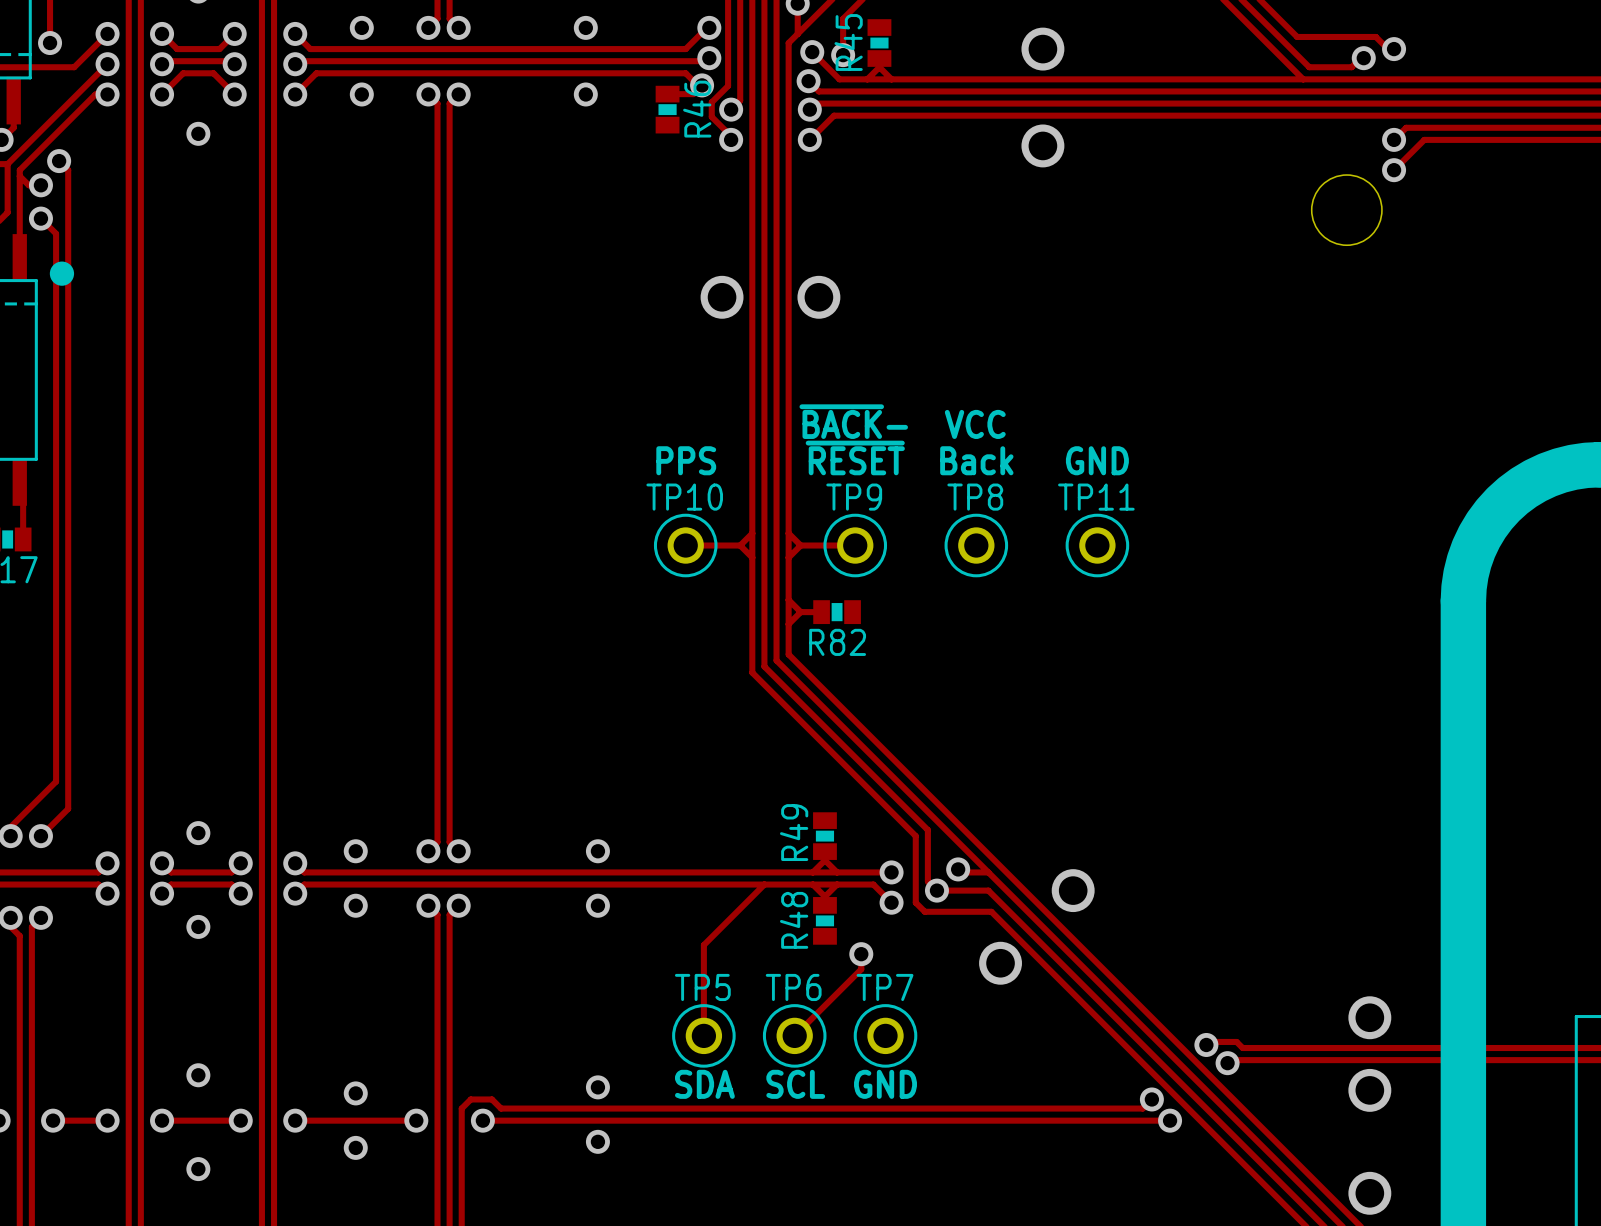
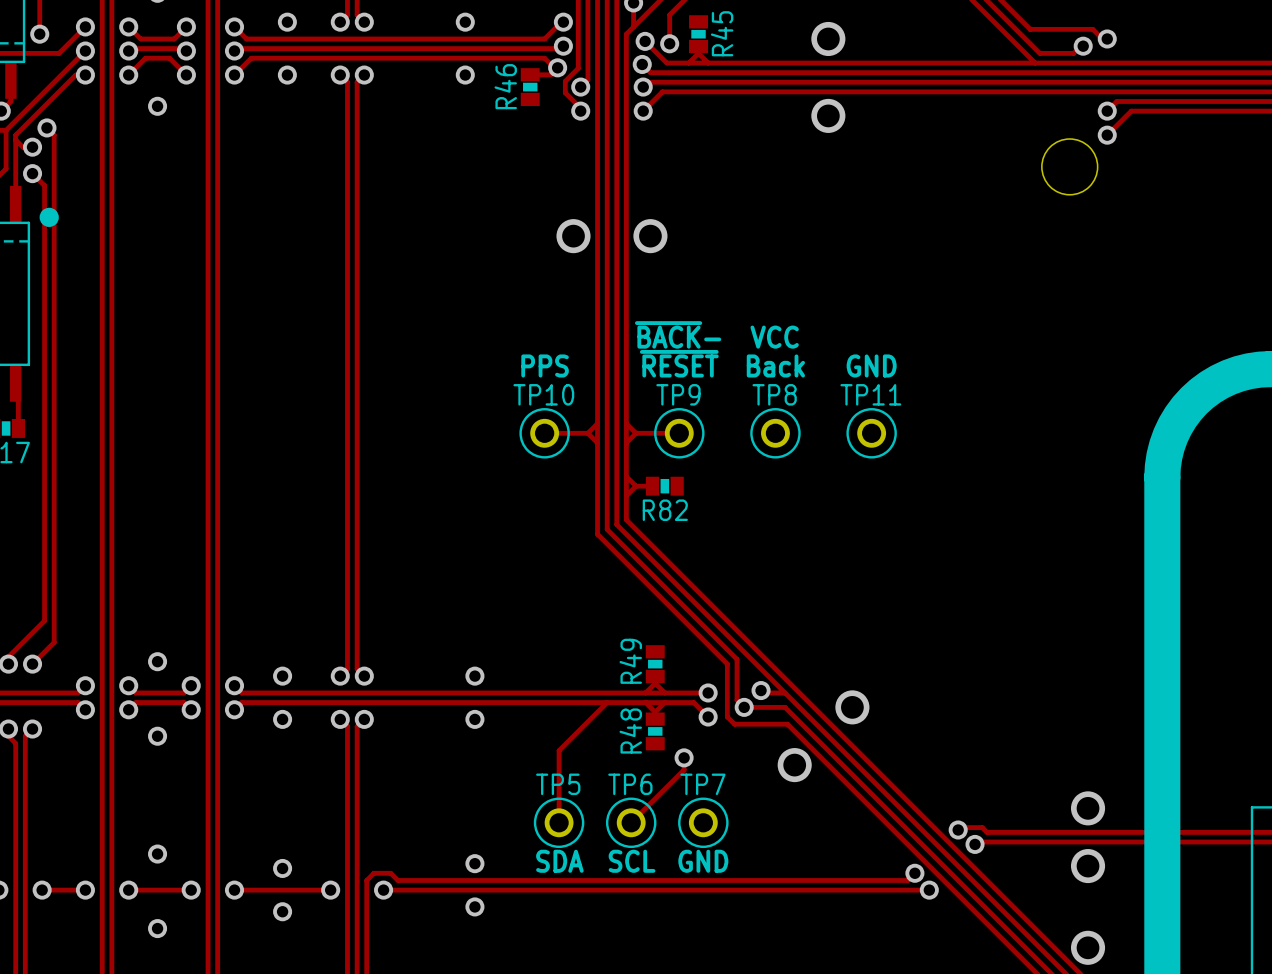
R45 name position: R45 (848, 42) -> R45 (722, 33)
R46 name position: R46 (697, 109) -> R46 (505, 86)

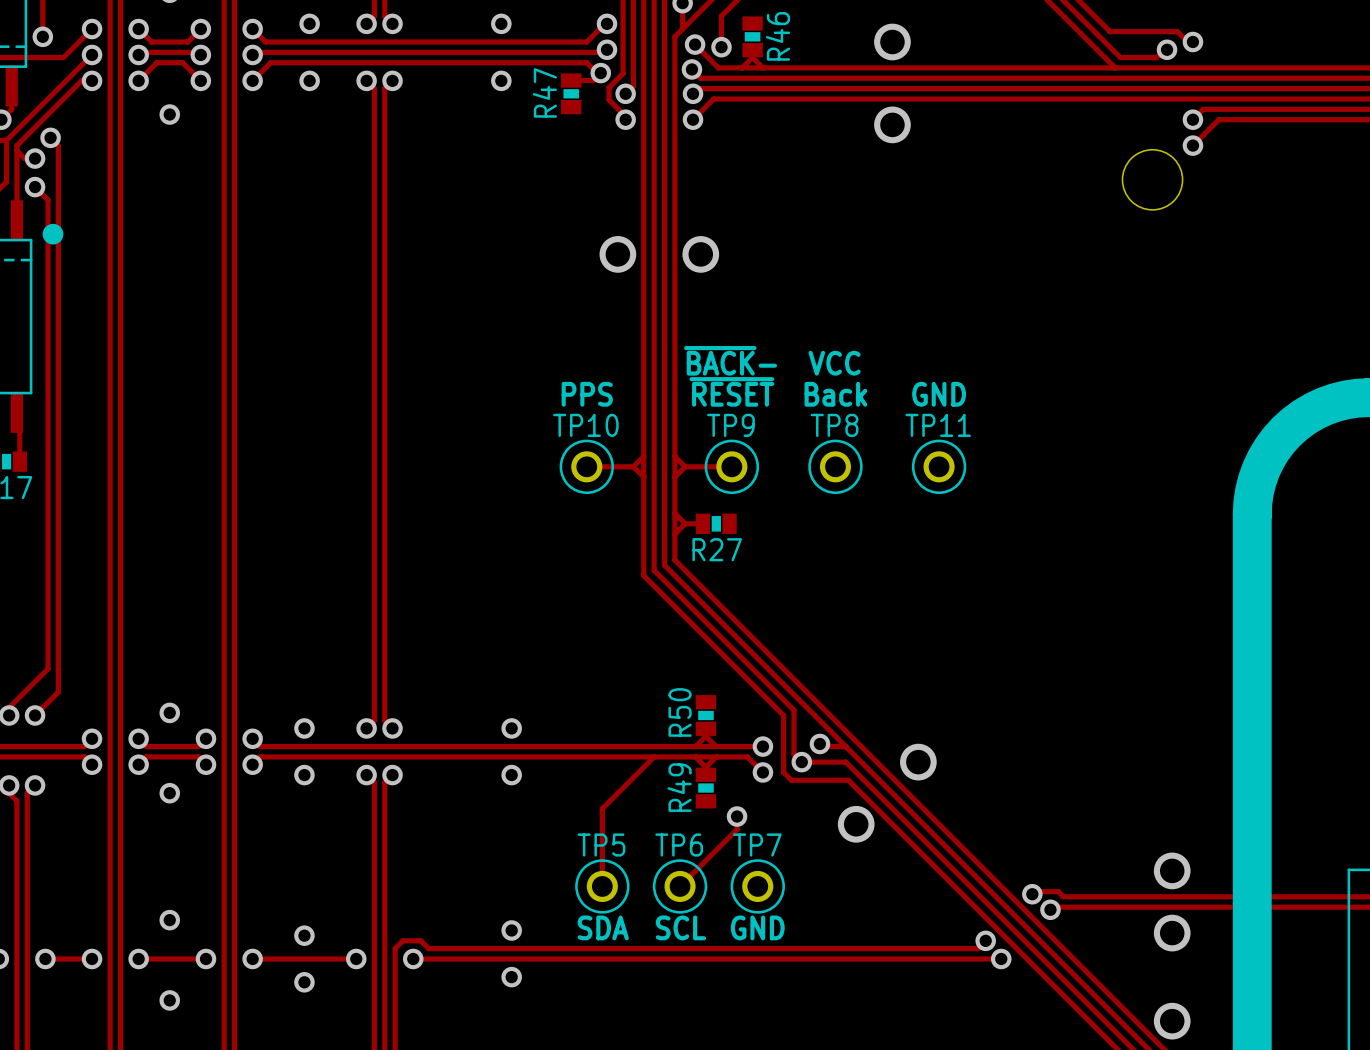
R45 name: R45 (722, 33) -> R46 (777, 36)
R46 name: R46 (505, 86) -> R47 (544, 92)
R82 name: R82 (665, 510) -> R27 (717, 549)
R49 name: R49 (630, 661) -> R50 (680, 712)
R48 name: R48 (630, 731) -> R49 (679, 787)

